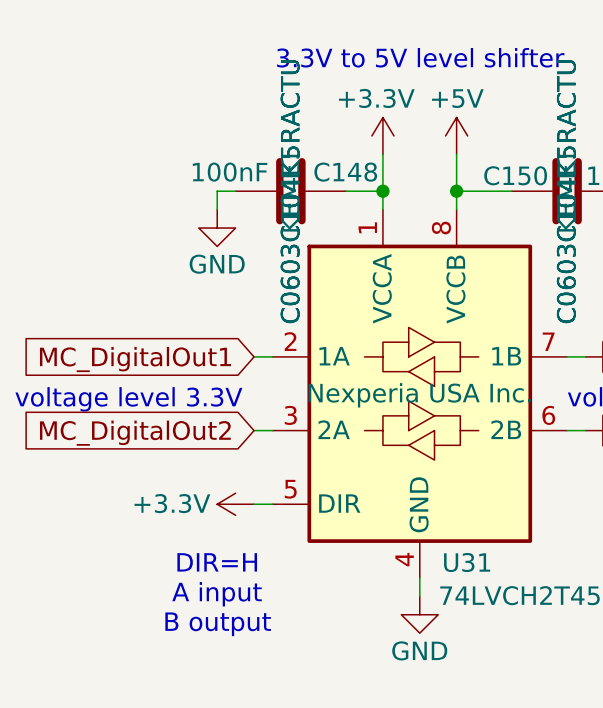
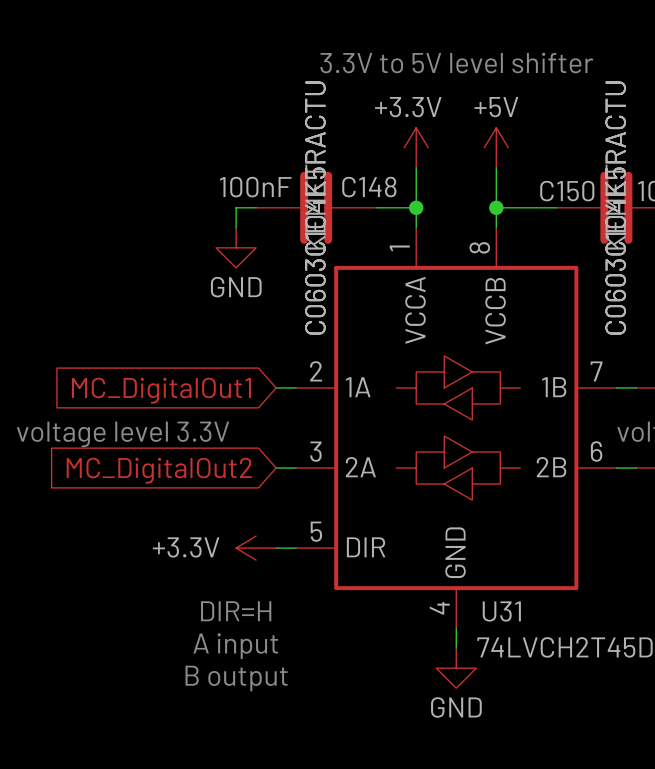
U31 text: Nexperia USA Inc. (419, 395) -> none

